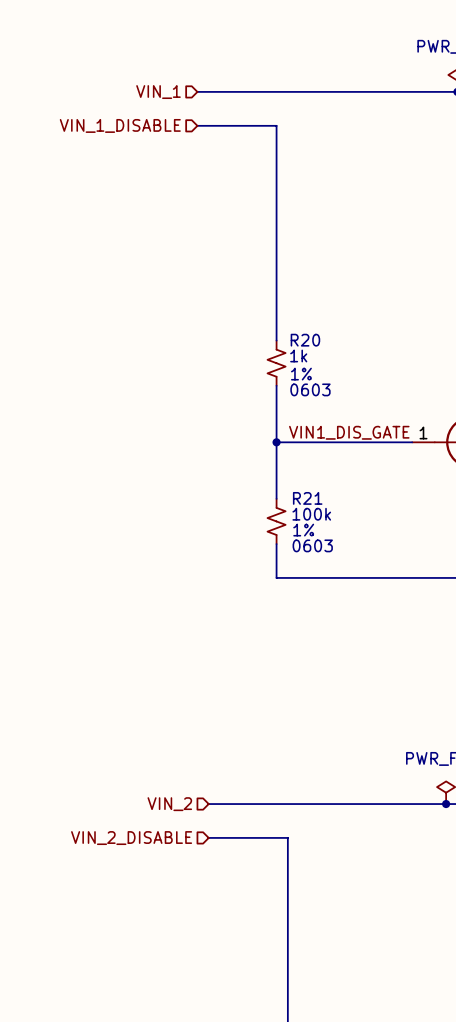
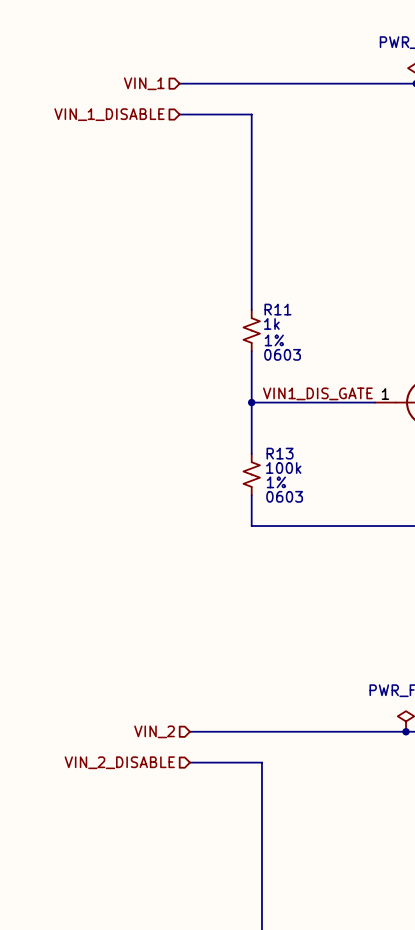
R20 name: R20 (305, 340) -> R11 (277, 309)
R21 name: R21 (307, 498) -> R13 (280, 453)

